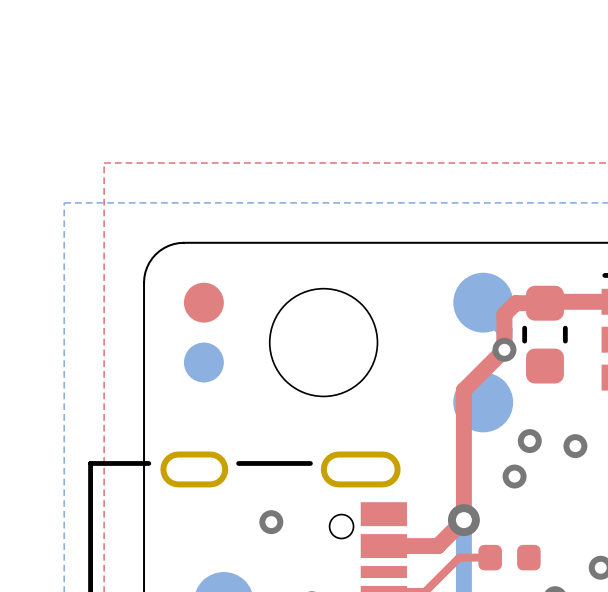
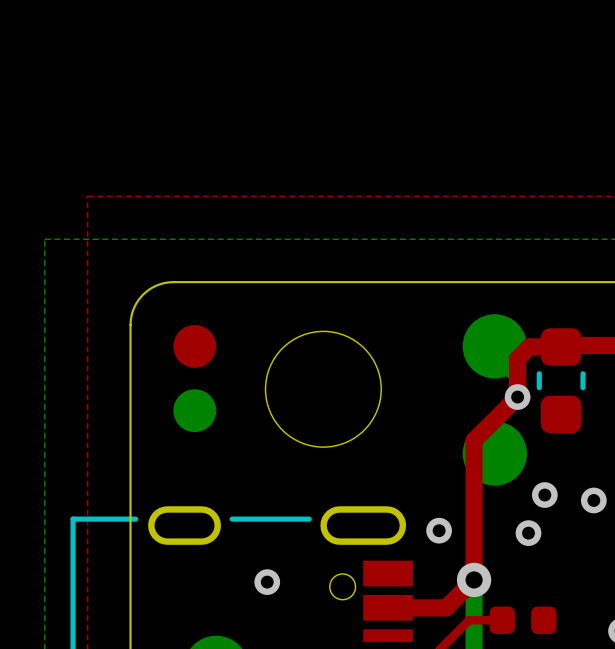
via: none -> (439, 530)

